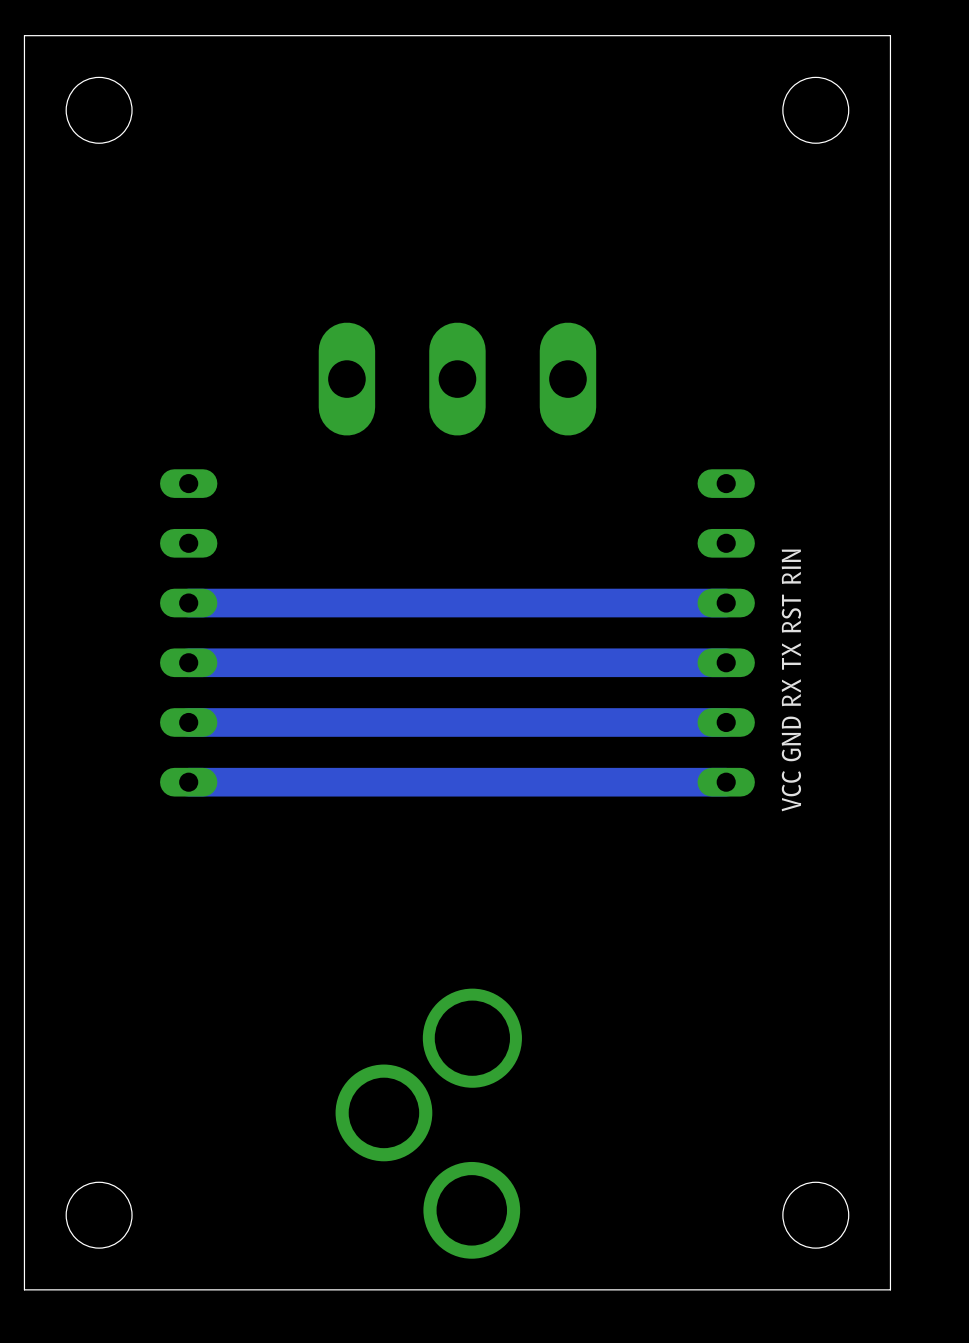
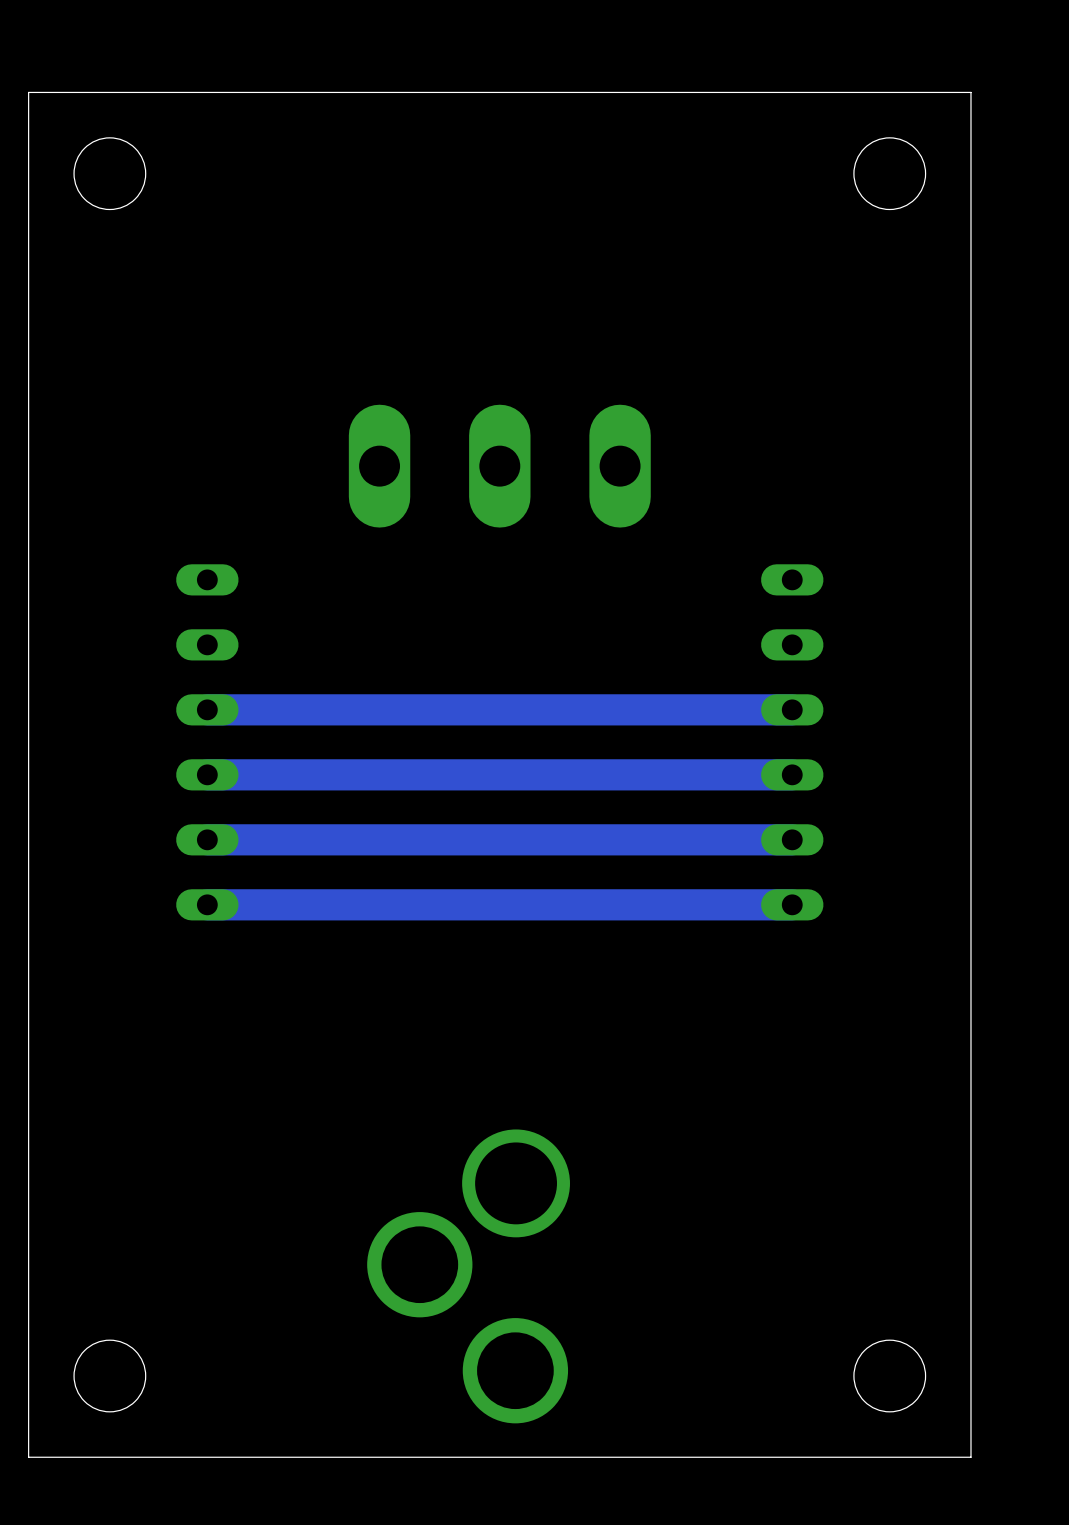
text: VCC GND RX TX RST RIN (791, 680) -> none

